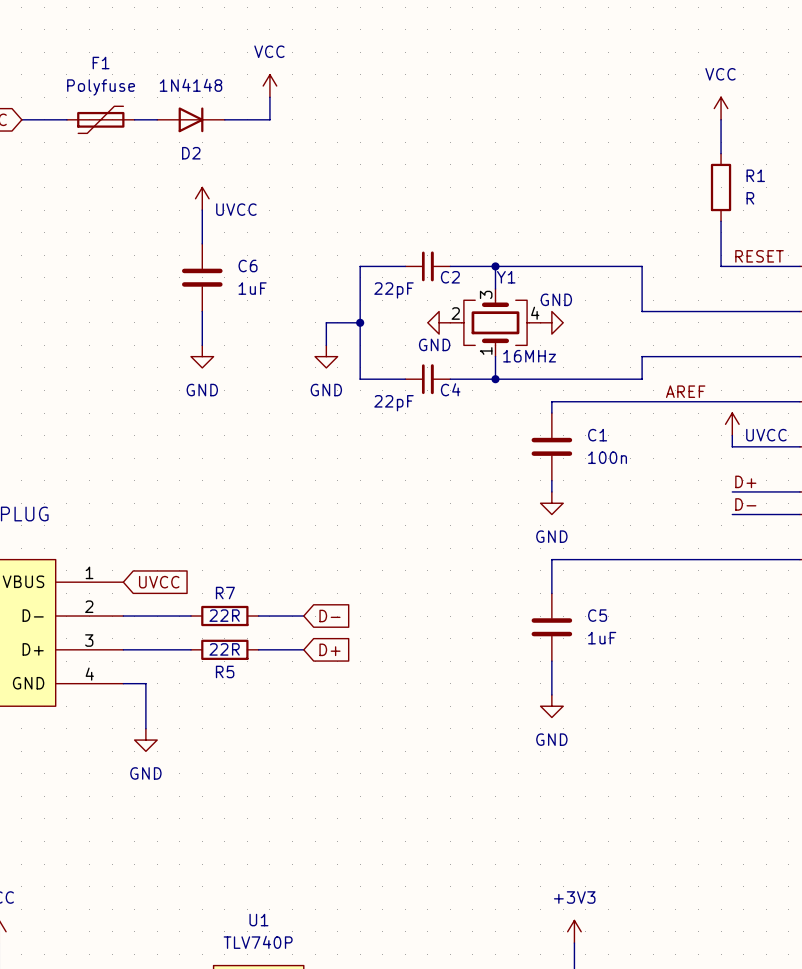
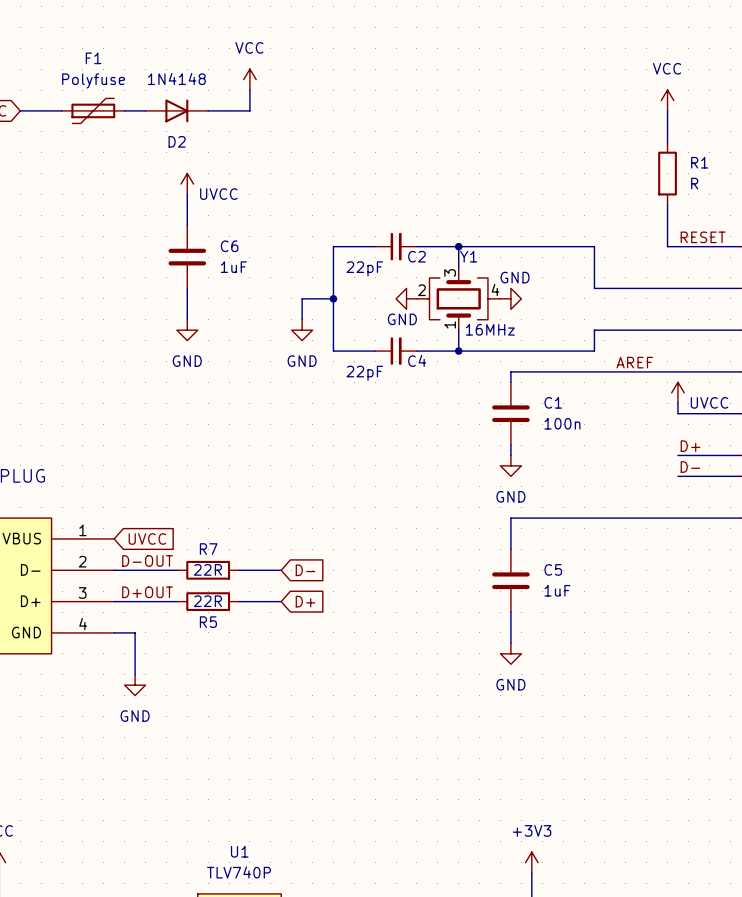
label: none -> D-OUT (147, 560)
label: none -> D+OUT (147, 592)

